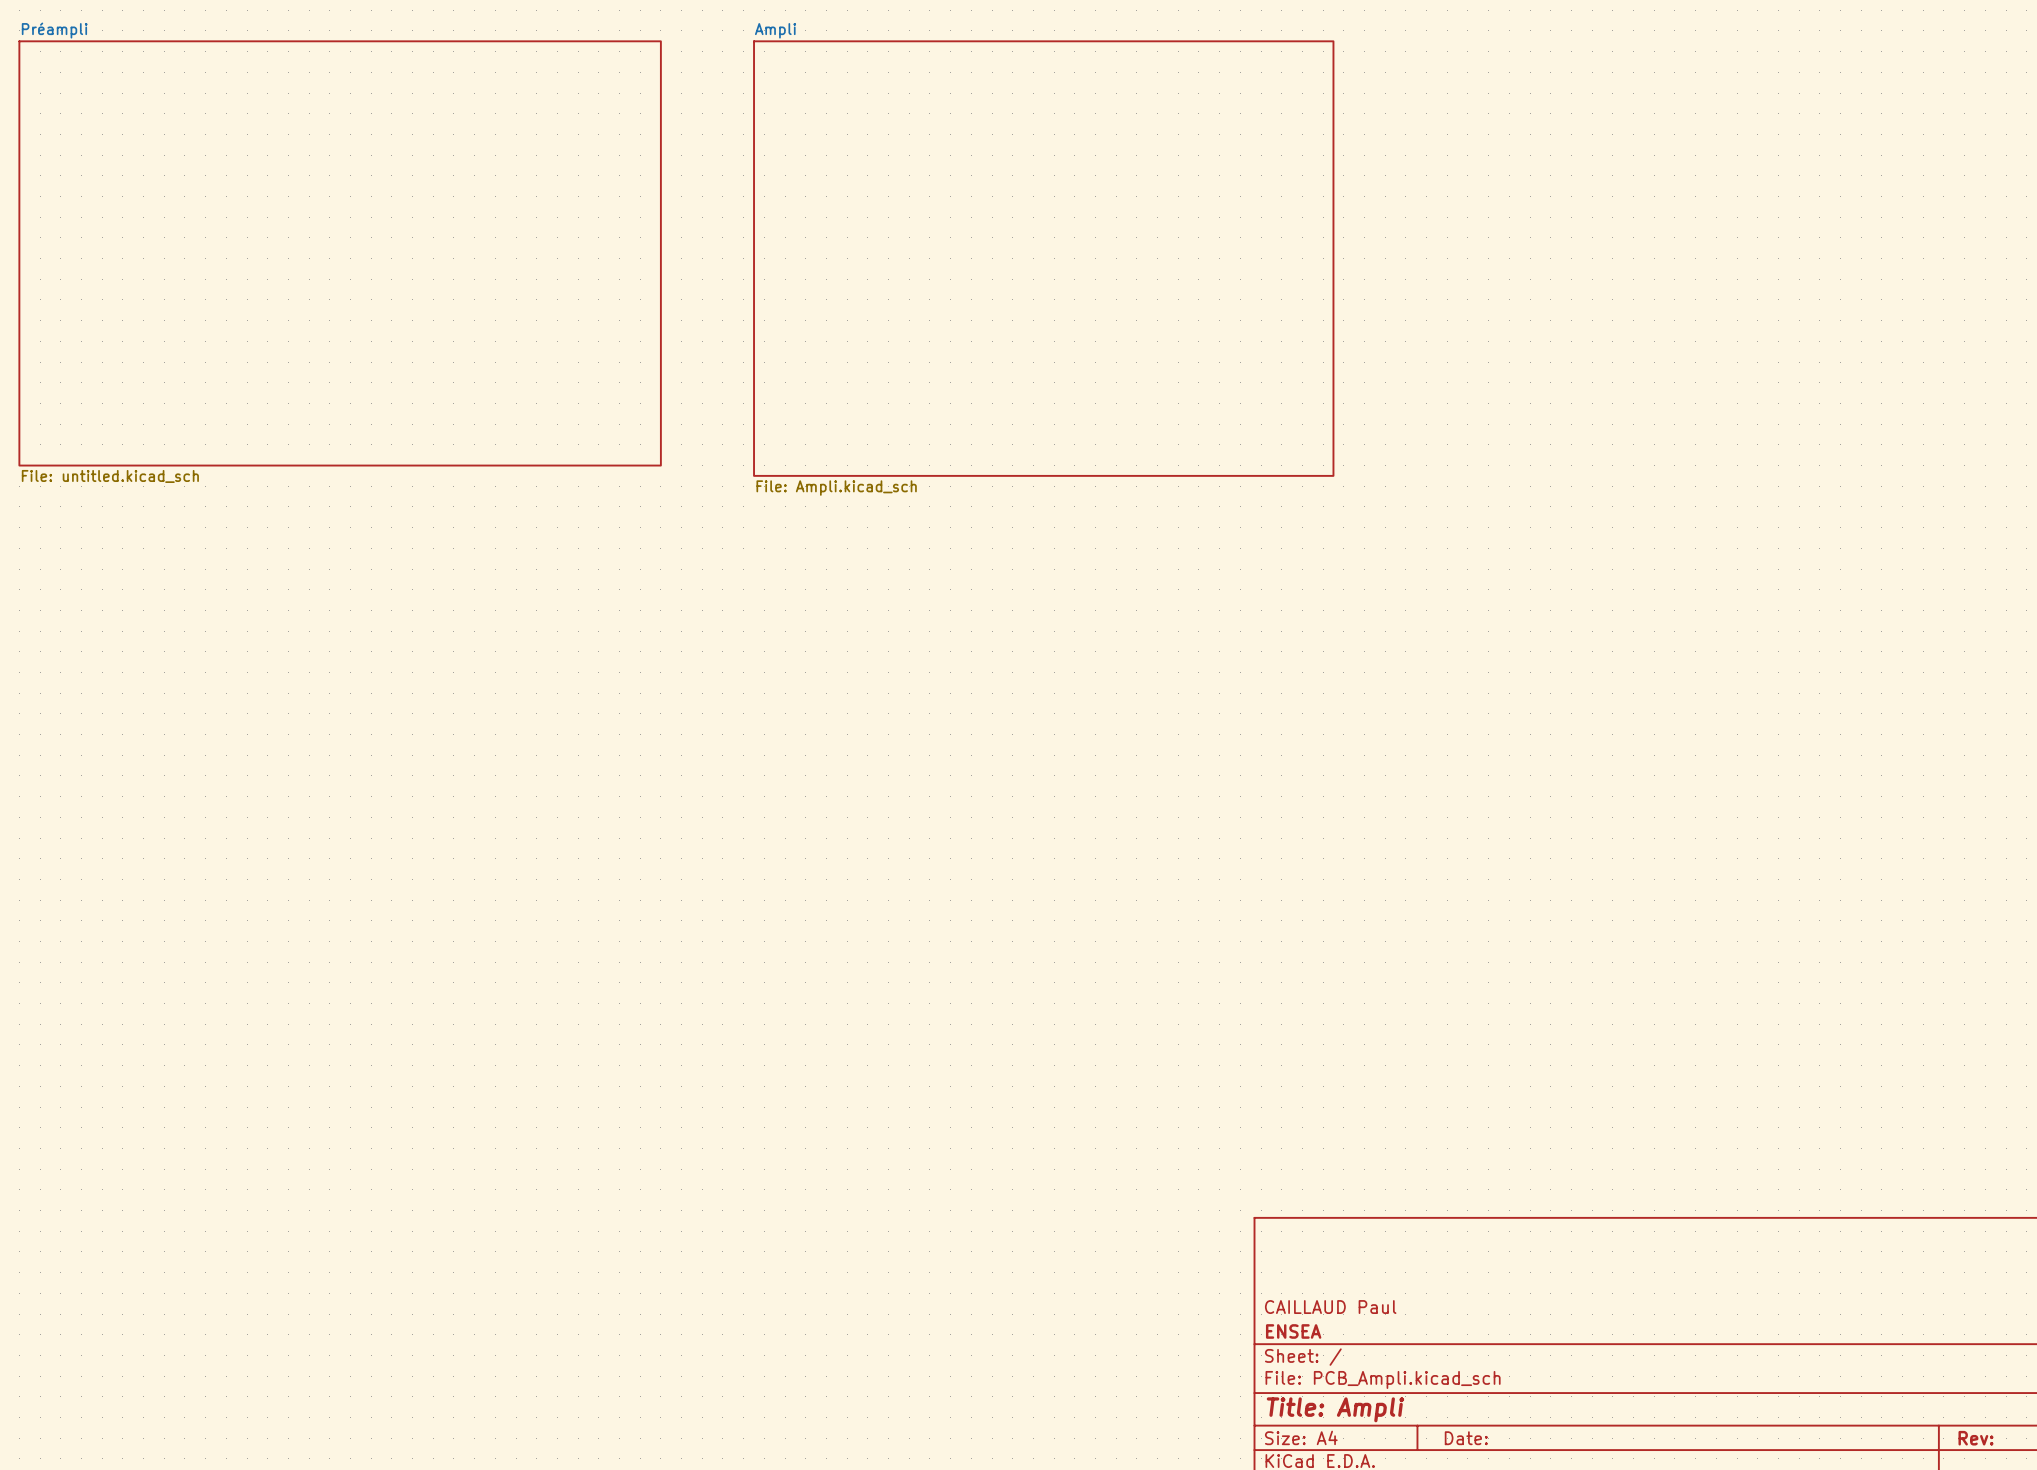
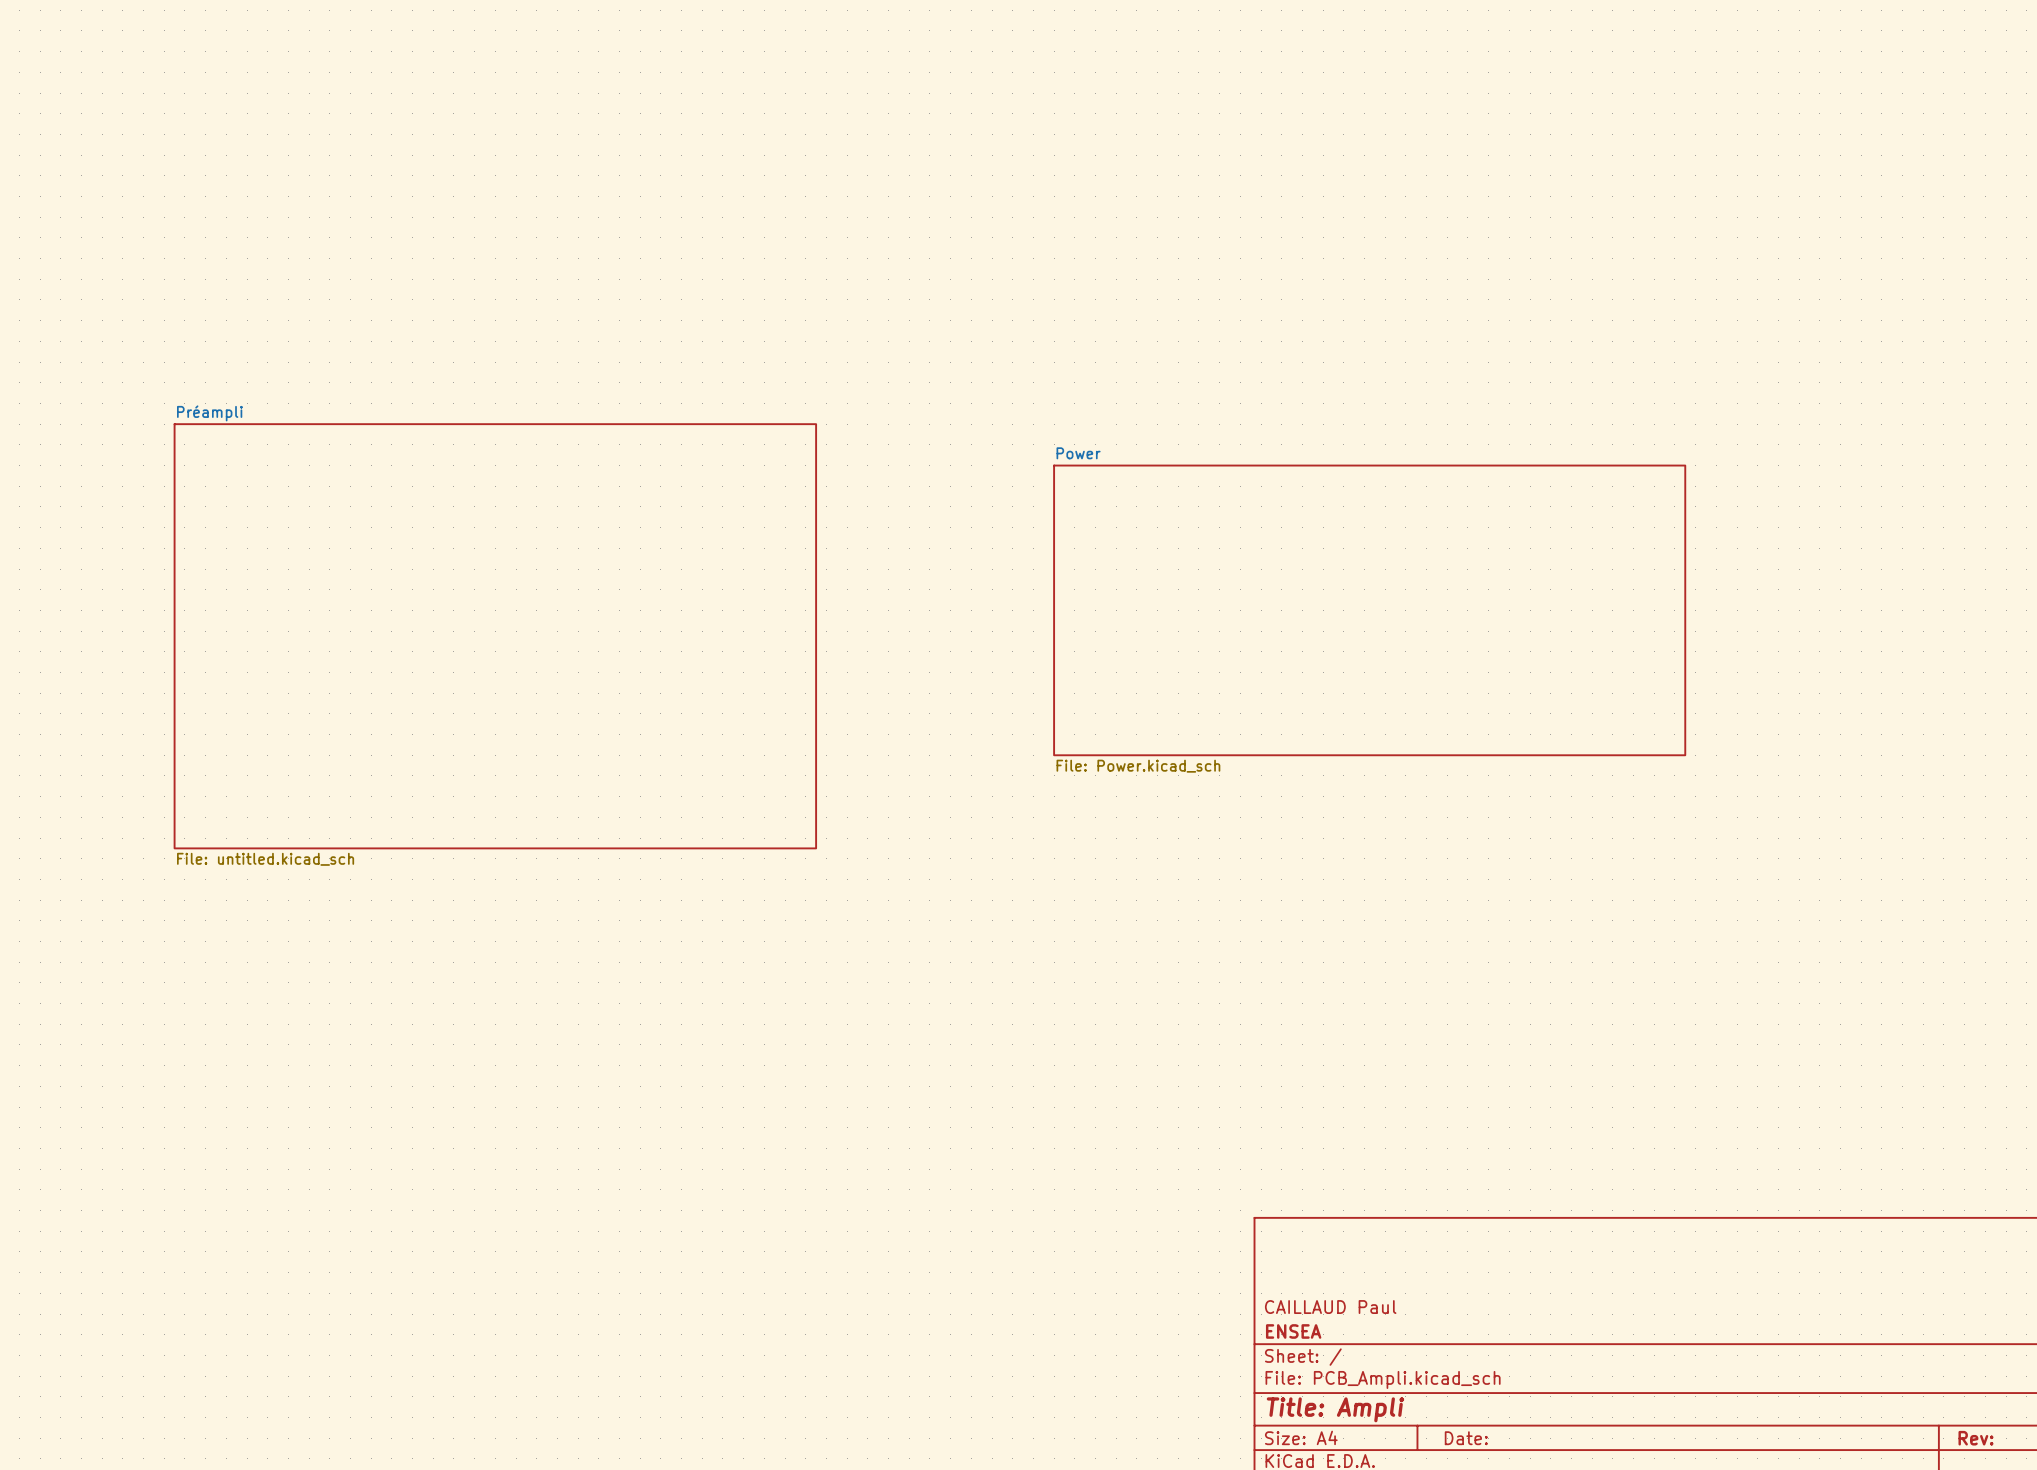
sheet Préampli: File: untitled.kicad_sch (340, 253) -> none
sheet Ampli: File: Ampli.kicad_sch (1043, 258) -> none
sheet Power: none -> File: Power.kicad_sch (1369, 610)
sheet Préampli: none -> File: untitled.kicad_sch (495, 636)

